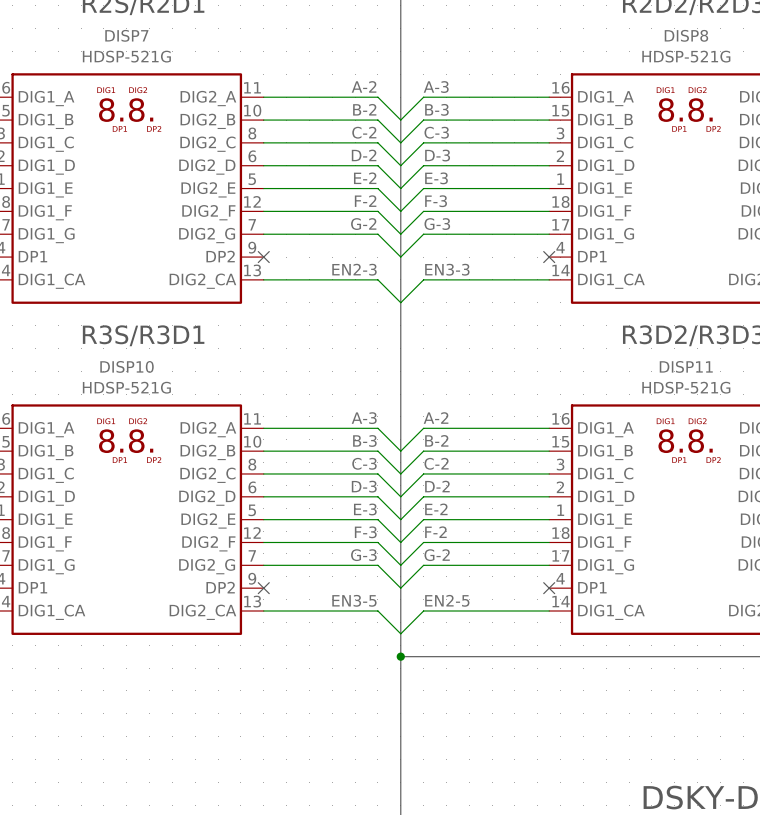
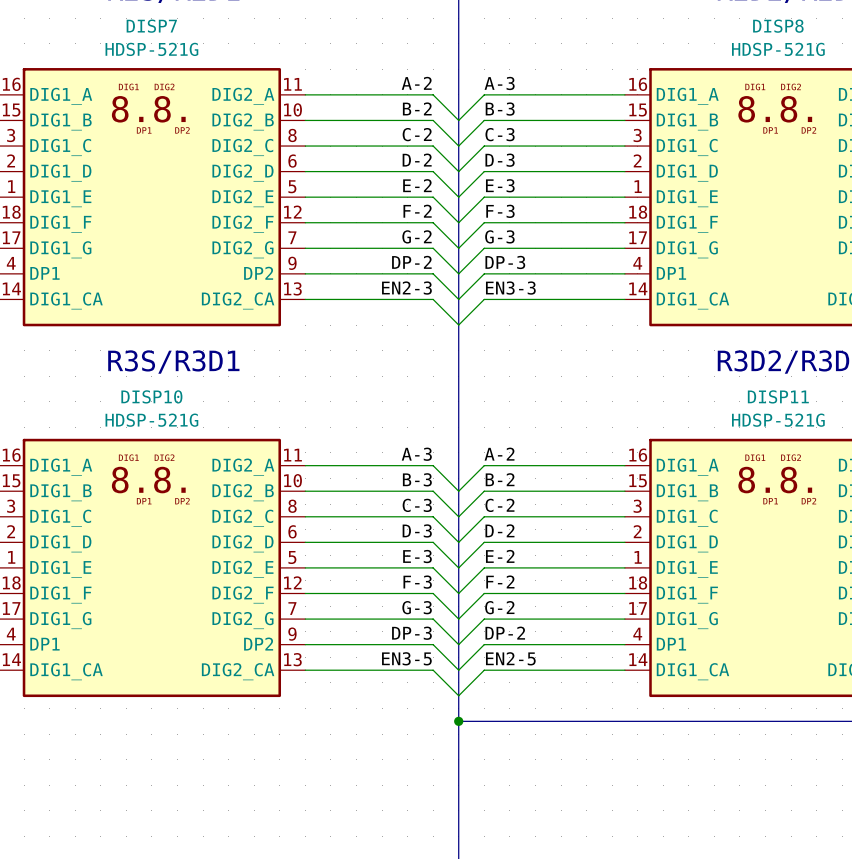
label: none -> DP-2 (411, 262)
label: none -> DP-3 (505, 262)
wire: none -> (305, 273) (433, 273) (458, 299) (484, 273) (624, 273)
no-connect mark: (263, 257) -> none
no-connect mark: (549, 257) -> none
label: none -> DP-3 (411, 633)
label: none -> DP-2 (505, 633)
wire: none -> (305, 644) (433, 644) (458, 670) (484, 644) (624, 644)
no-connect mark: (263, 588) -> none
no-connect mark: (549, 588) -> none

